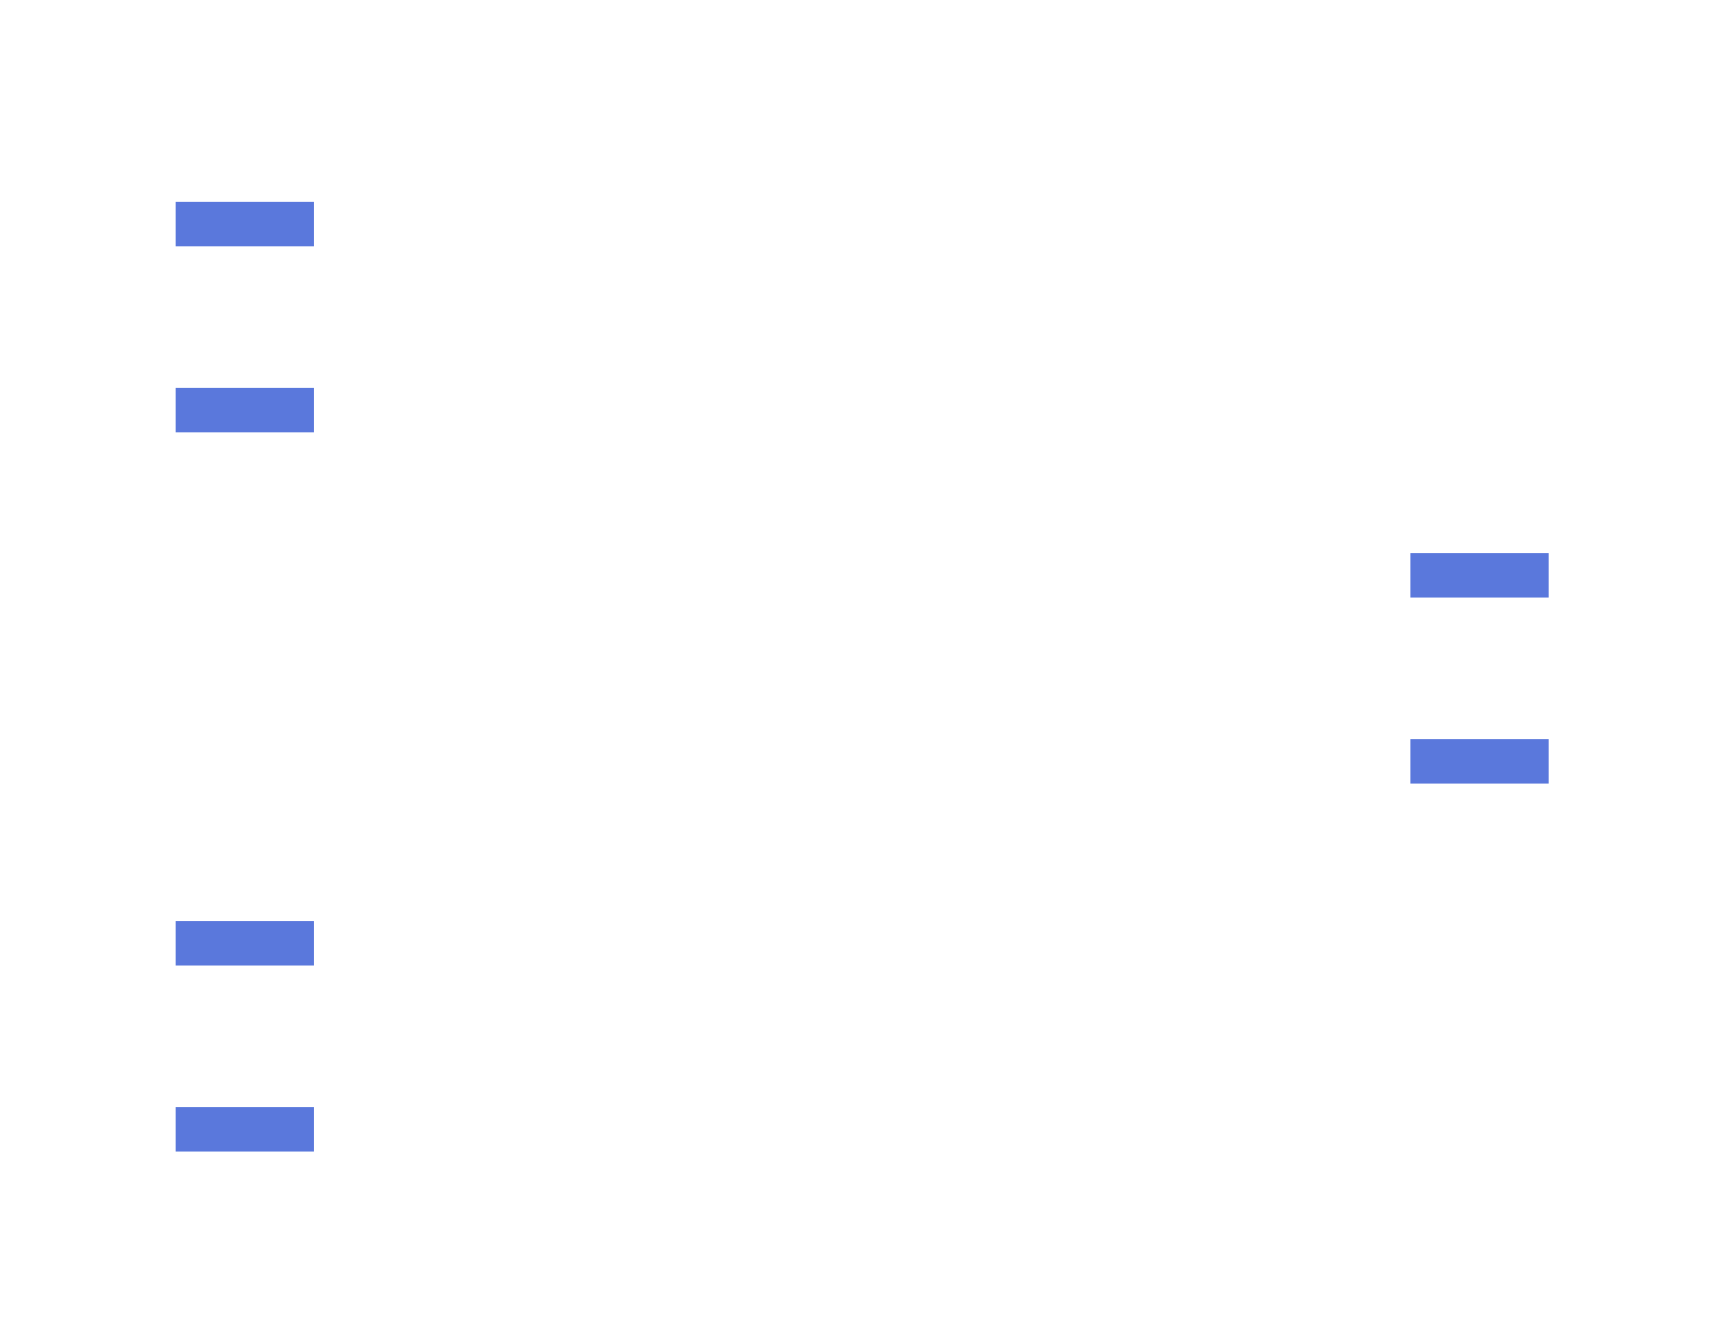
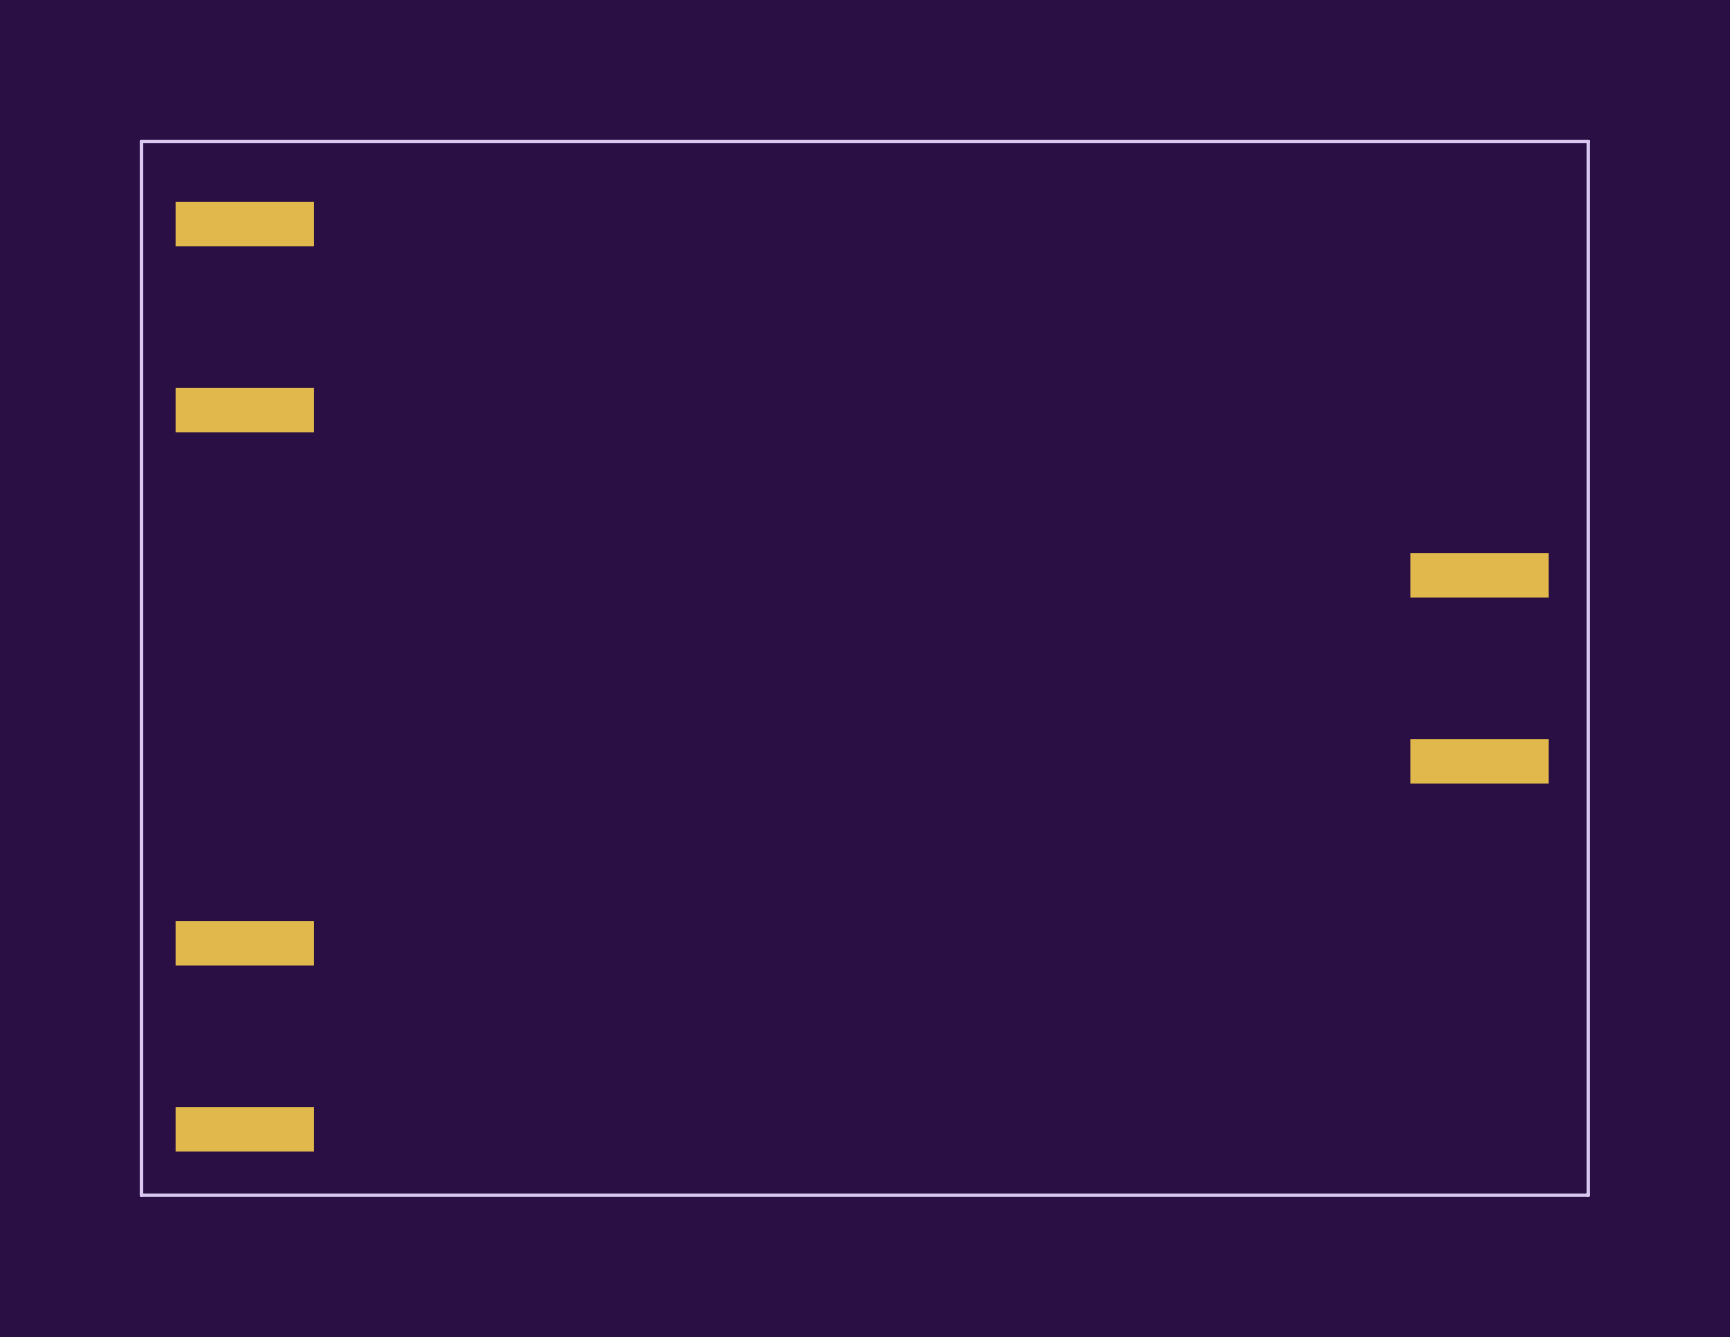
board edge: none -> (1588, 141) (1588, 1195) (141, 1195) (141, 141) (1588, 141)

